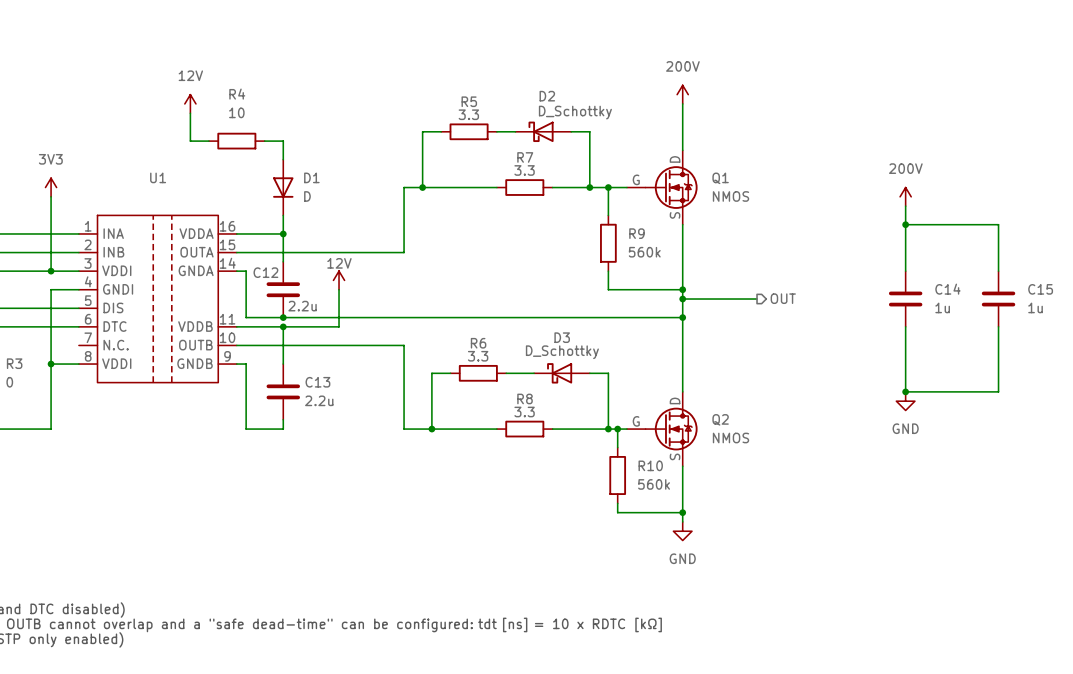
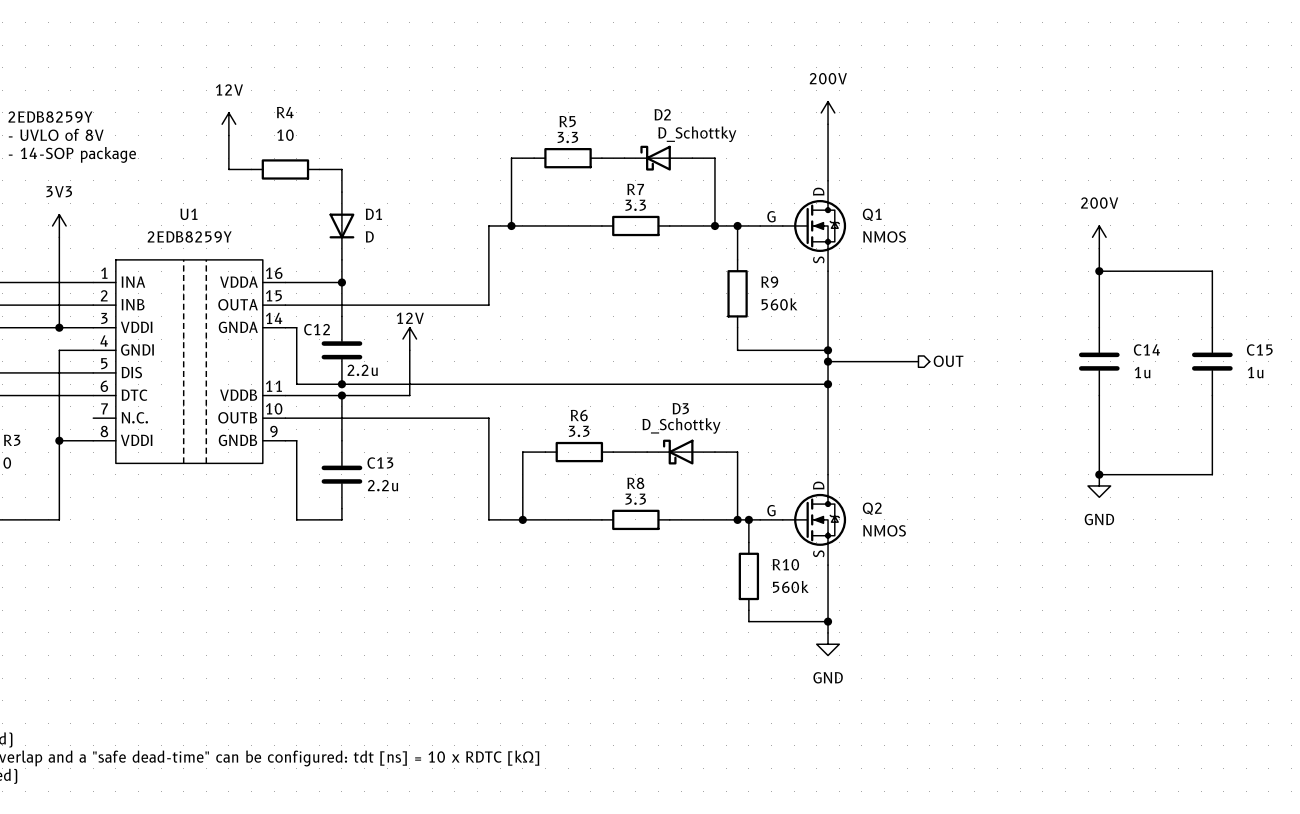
text: none -> 2EDB8259Y (50, 117)
text: none -> - UVLO of 8V (56, 134)
text: none -> - 14-SOP package (72, 154)
U1 value: none -> 2EDB8259Y (189, 236)

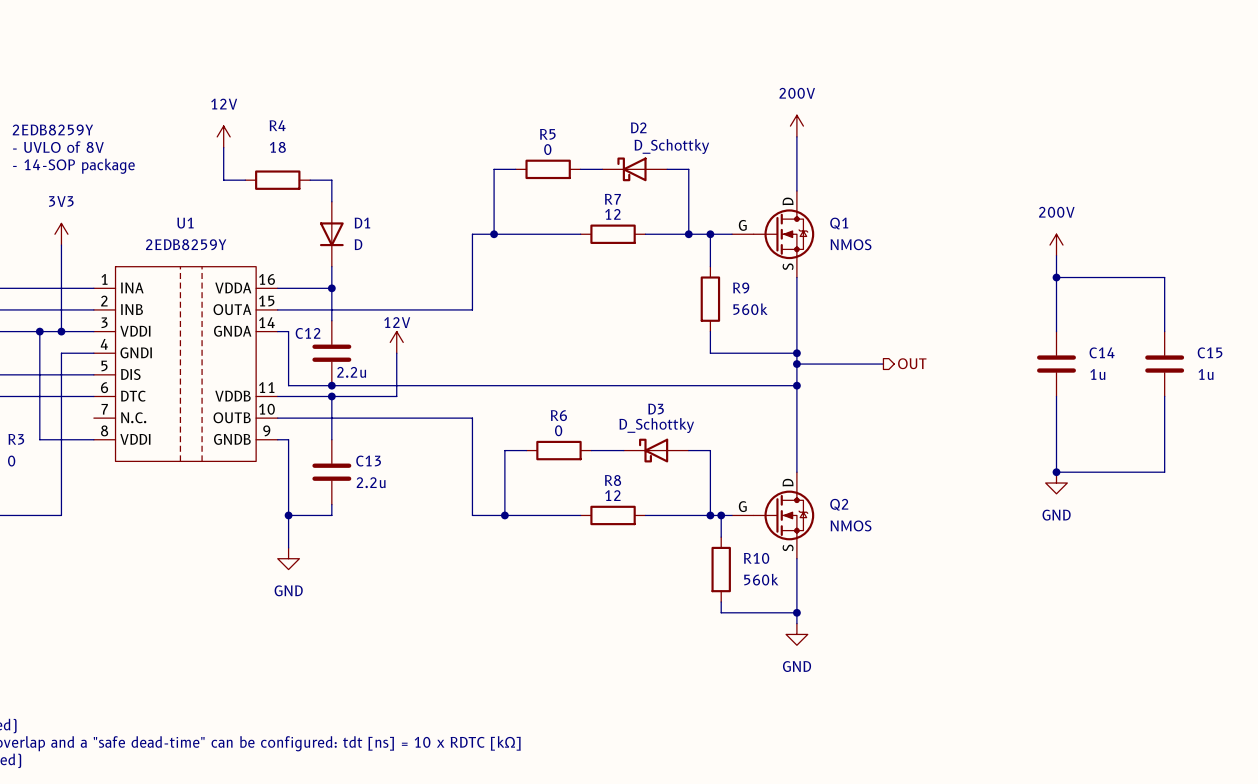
R4 value: 10 (285, 135) -> 18 (277, 147)
R5 value: 3.3 (567, 137) -> 0 (547, 149)
R7 value: 3.3 (635, 205) -> 12 (612, 214)
wire: none -> (39, 331) (39, 439) (61, 439)
junction: none -> (39, 331)
R6 value: 3.3 (579, 431) -> 0 (558, 430)
junction: (59, 440) -> none
R8 value: 3.3 (635, 499) -> 12 (612, 495)
wire: none -> (288, 515) (288, 547)
junction: none -> (288, 515)
power symbol: none -> GND (288, 558)

